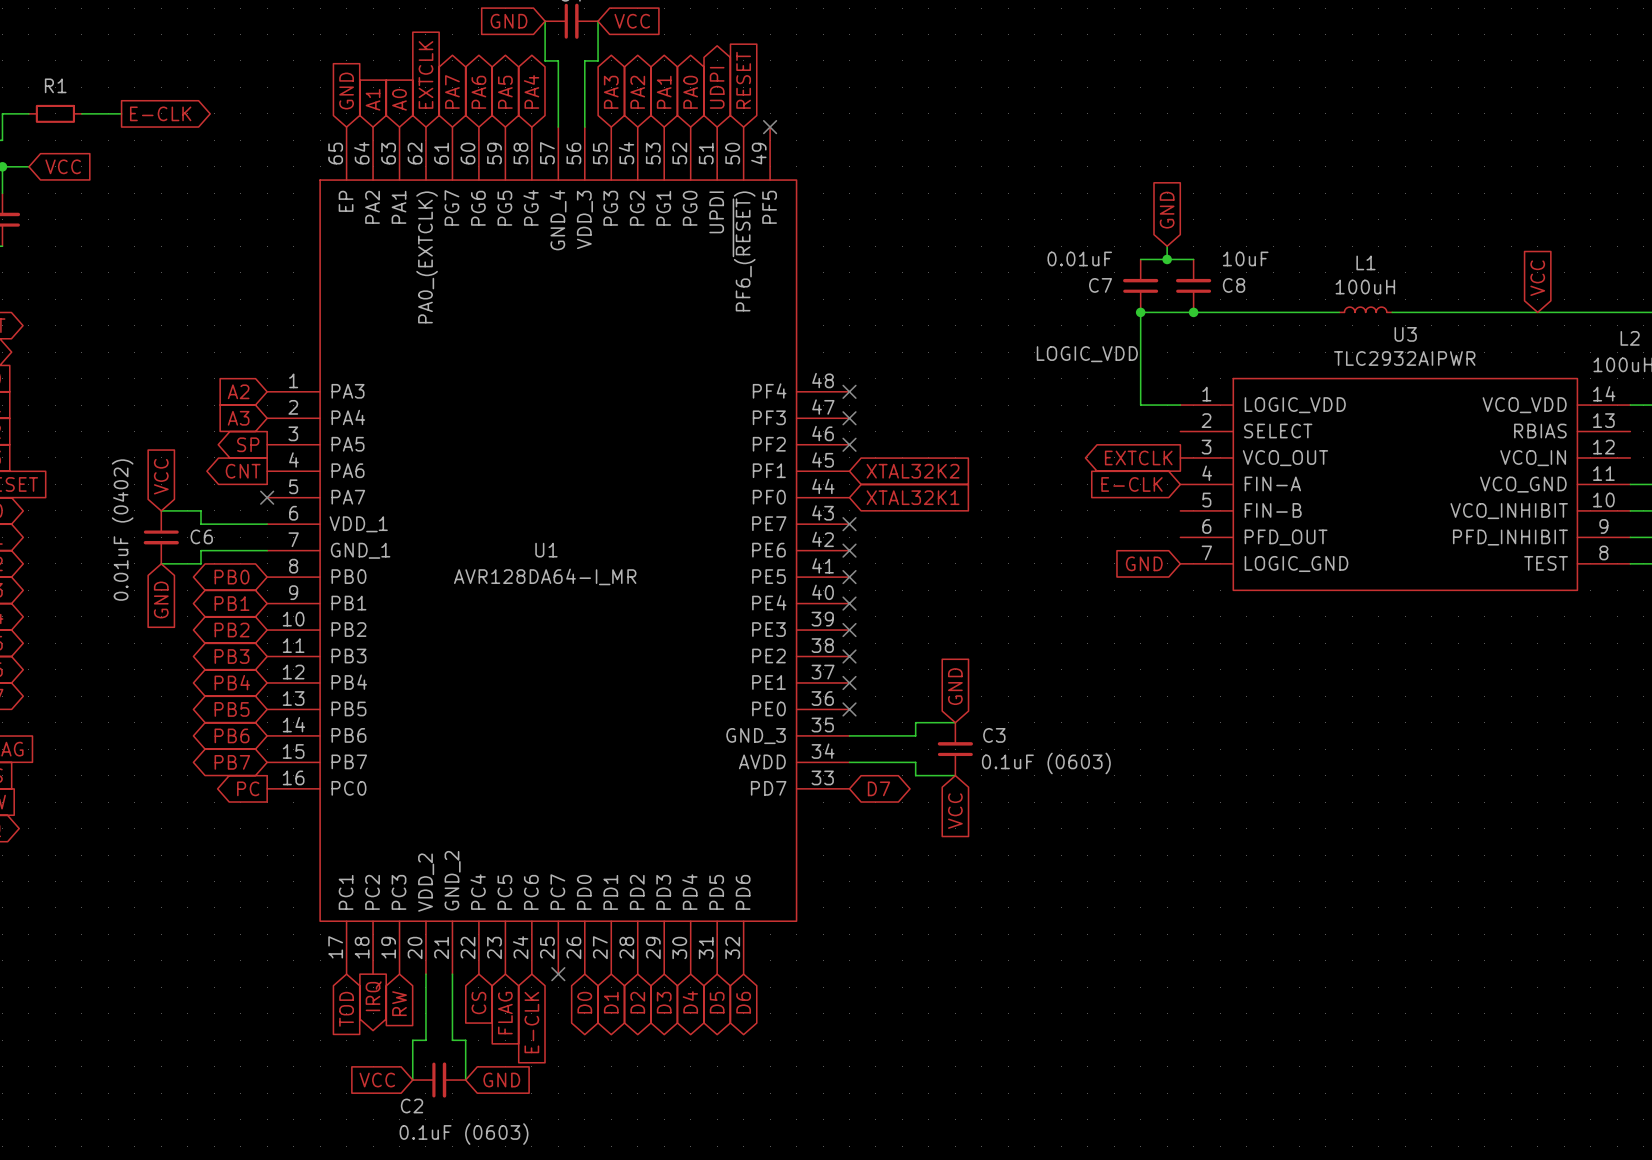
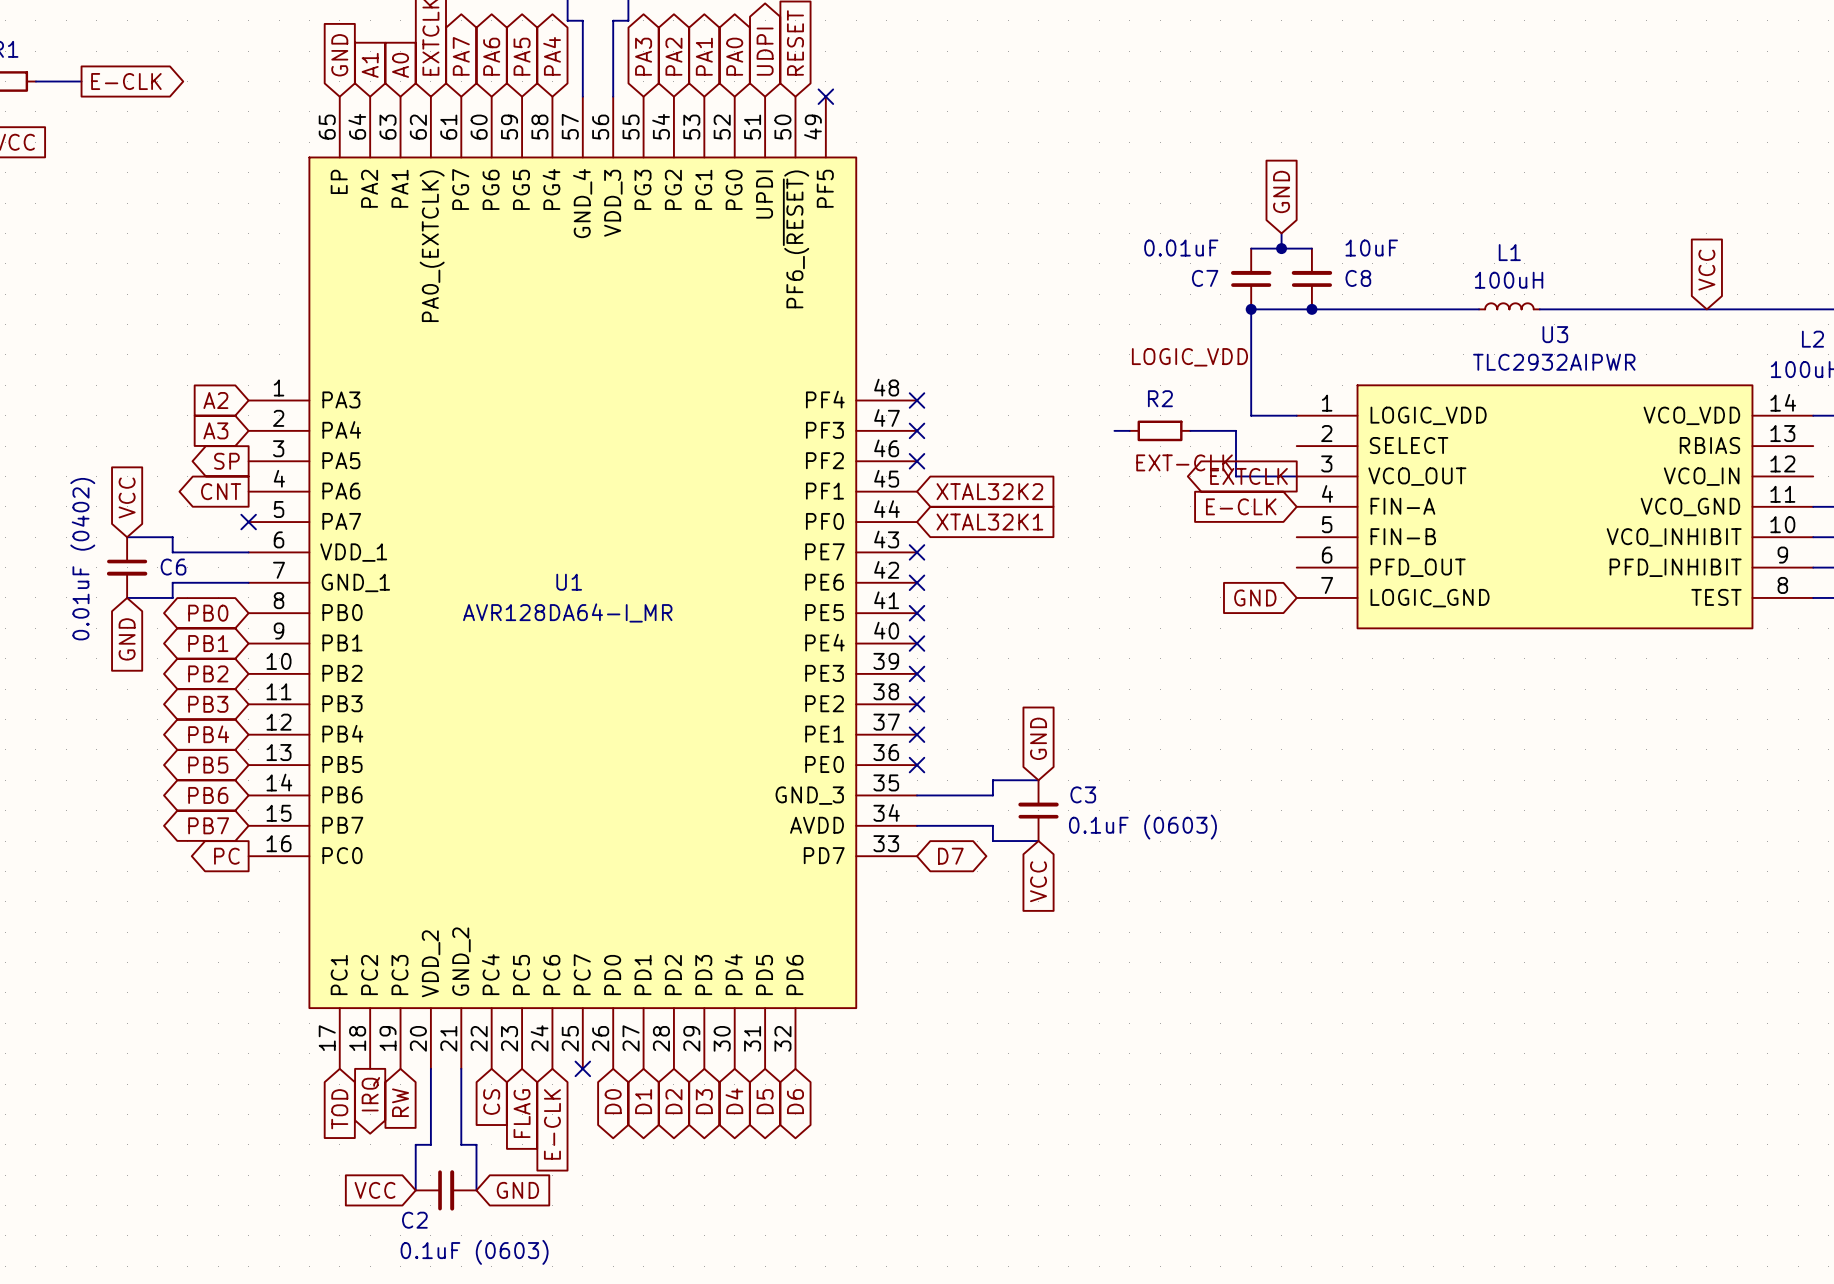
wire: none -> (1114, 430) (1129, 430)
R2: none -> (1160, 430)
wire: none -> (1190, 430) (1235, 430) (1235, 476) (1296, 476)
label: none -> EXT-CLK (1184, 462)

